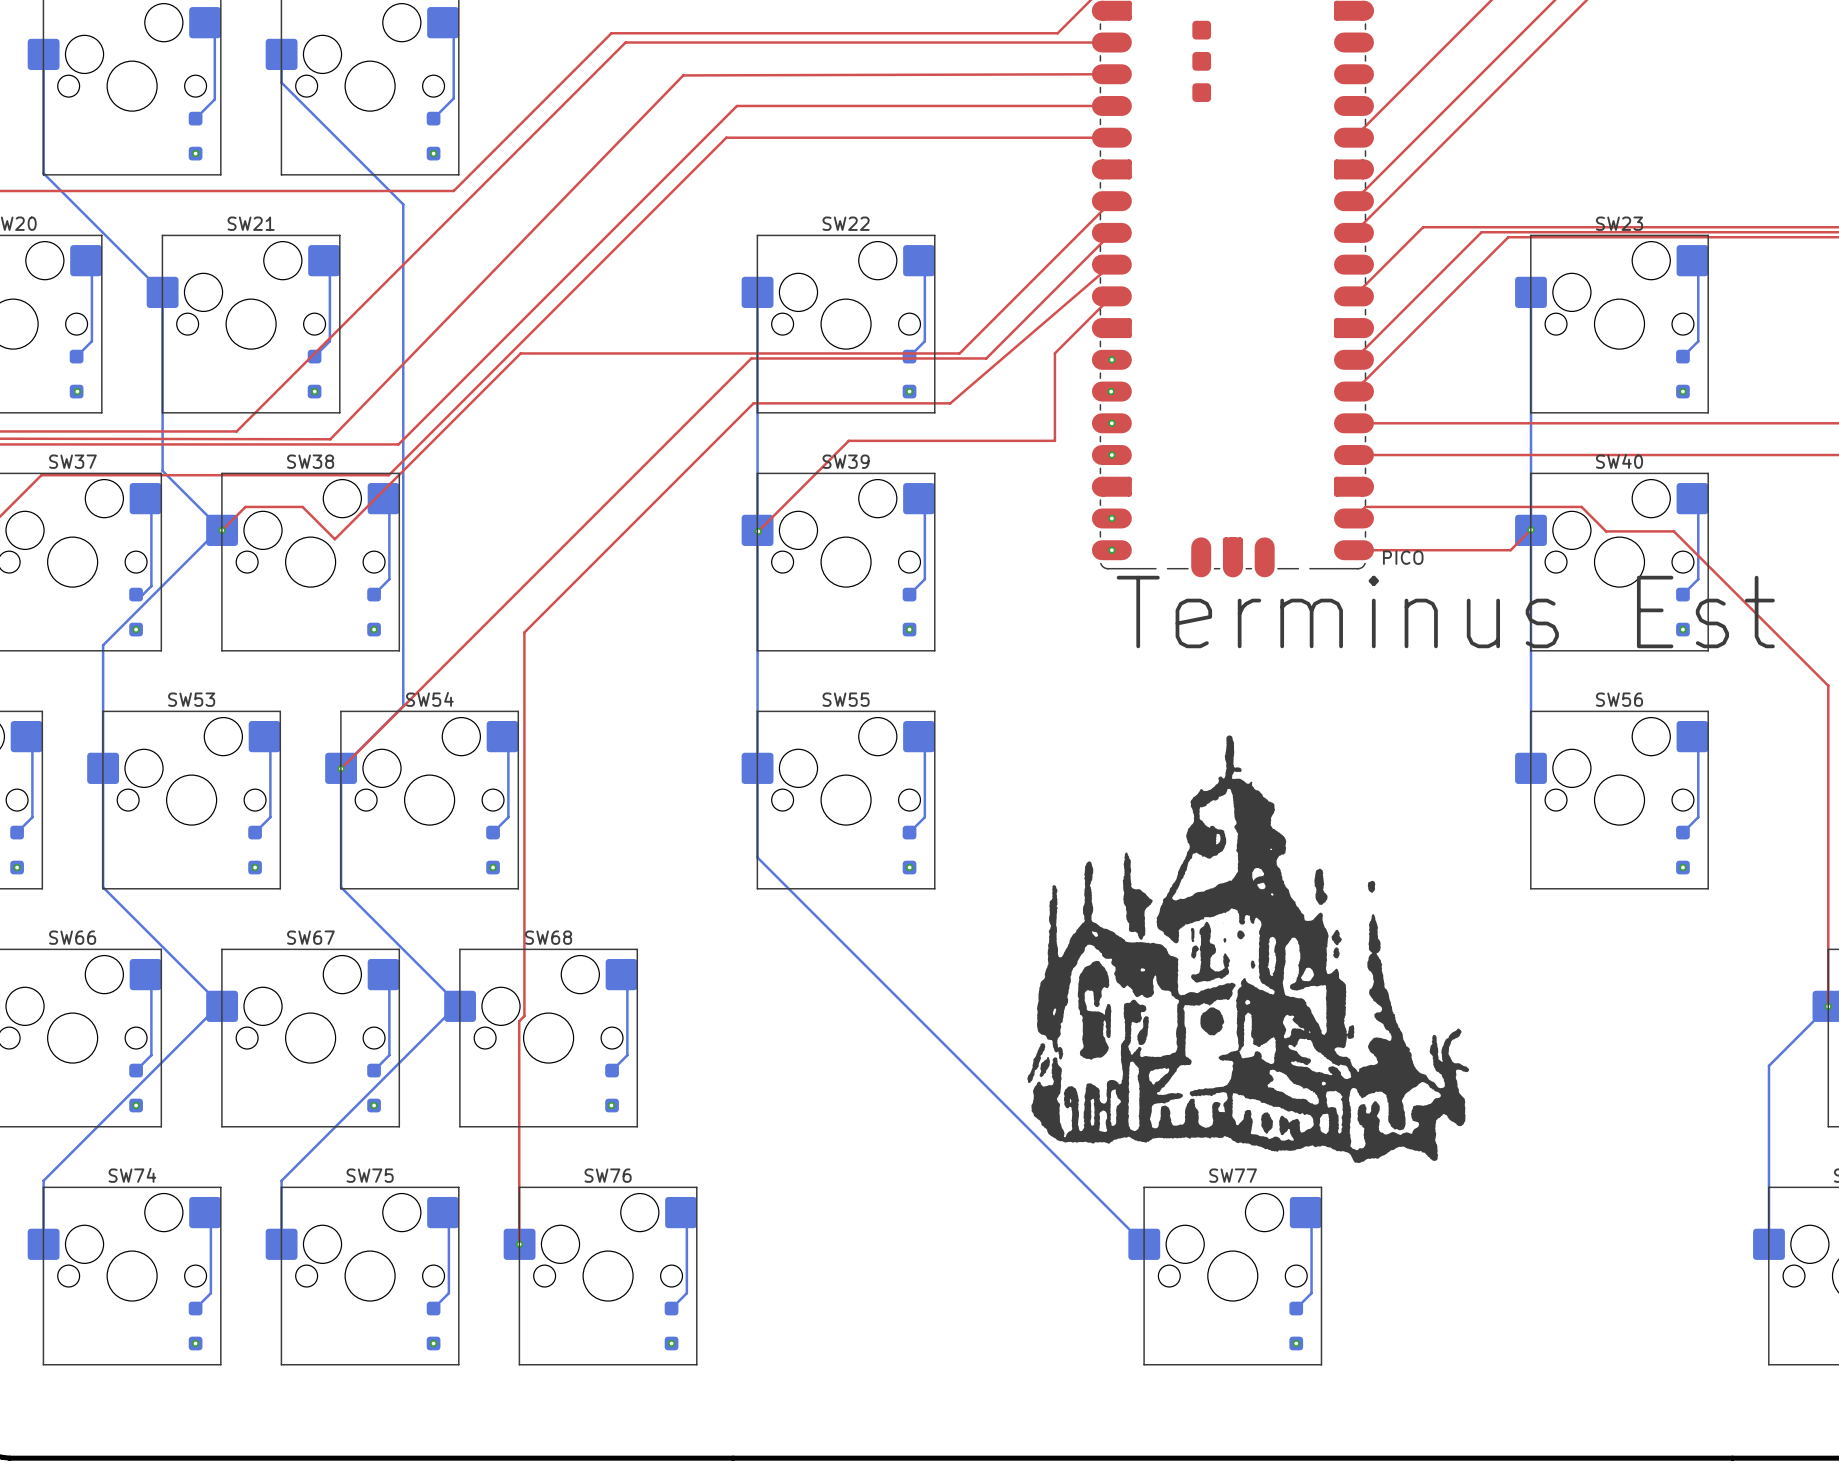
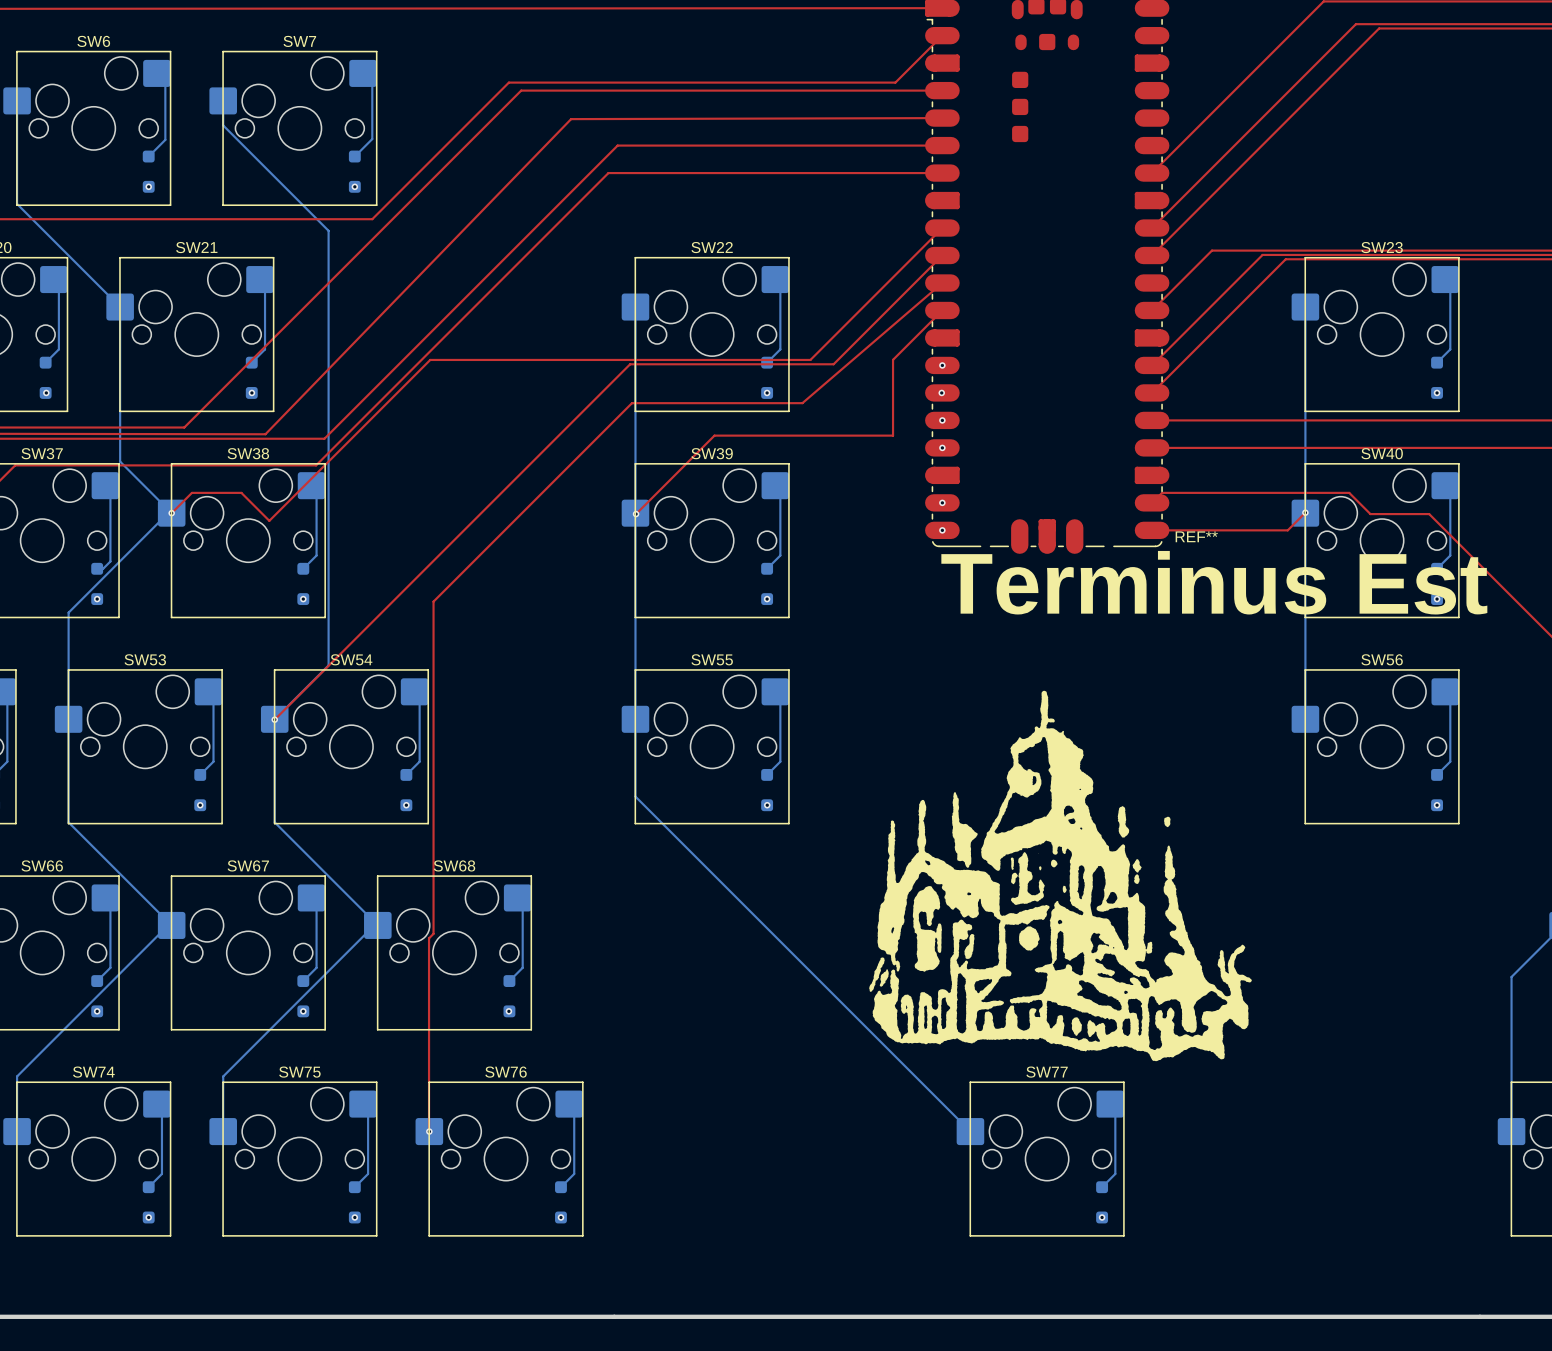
PICO name: PICO (1403, 557) -> REF** (1196, 536)

